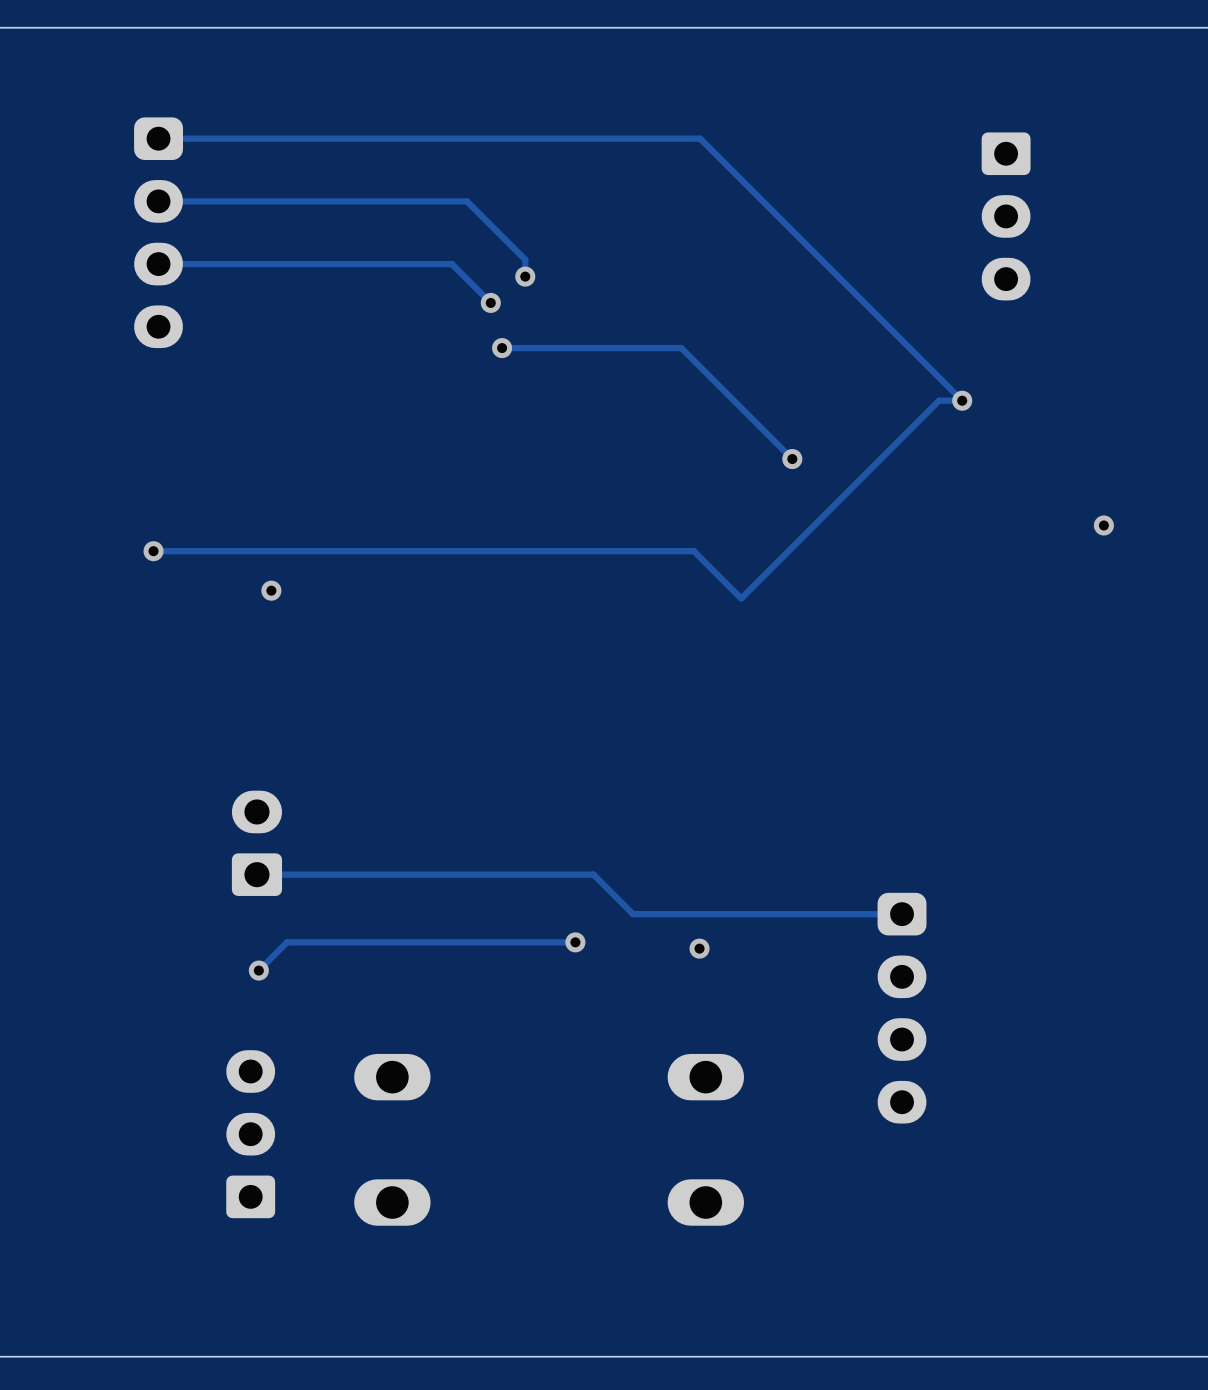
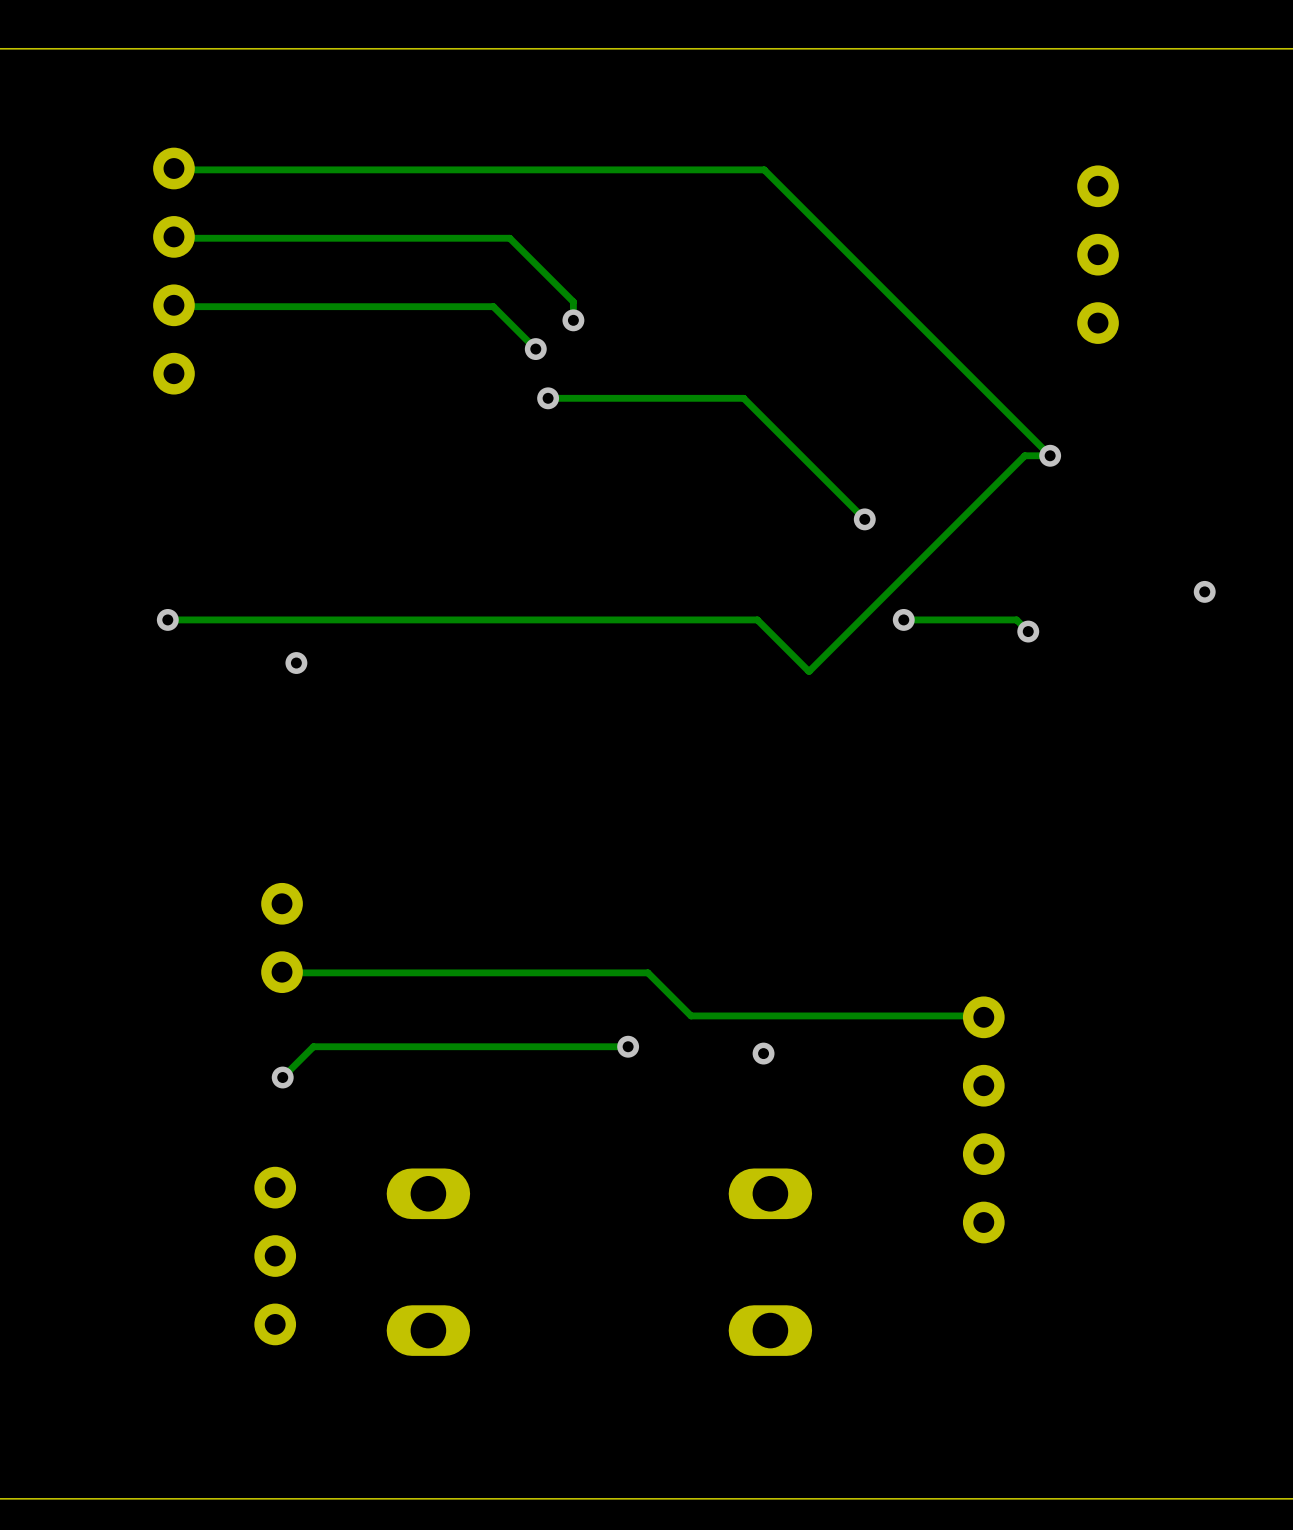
part footprint: [134, 117, 183, 349] -> [153, 147, 195, 395]
part footprint: [981, 132, 1031, 301] -> [1077, 165, 1119, 344]
track: none -> (903, 619) (1016, 619) (1028, 631)
via: none -> (903, 619)
via: none -> (1028, 631)
part footprint: [231, 790, 283, 896] -> [261, 882, 303, 994]
part footprint: [877, 892, 927, 1124] -> [962, 996, 1005, 1244]
part footprint: [226, 1050, 276, 1219] -> [254, 1166, 297, 1346]

